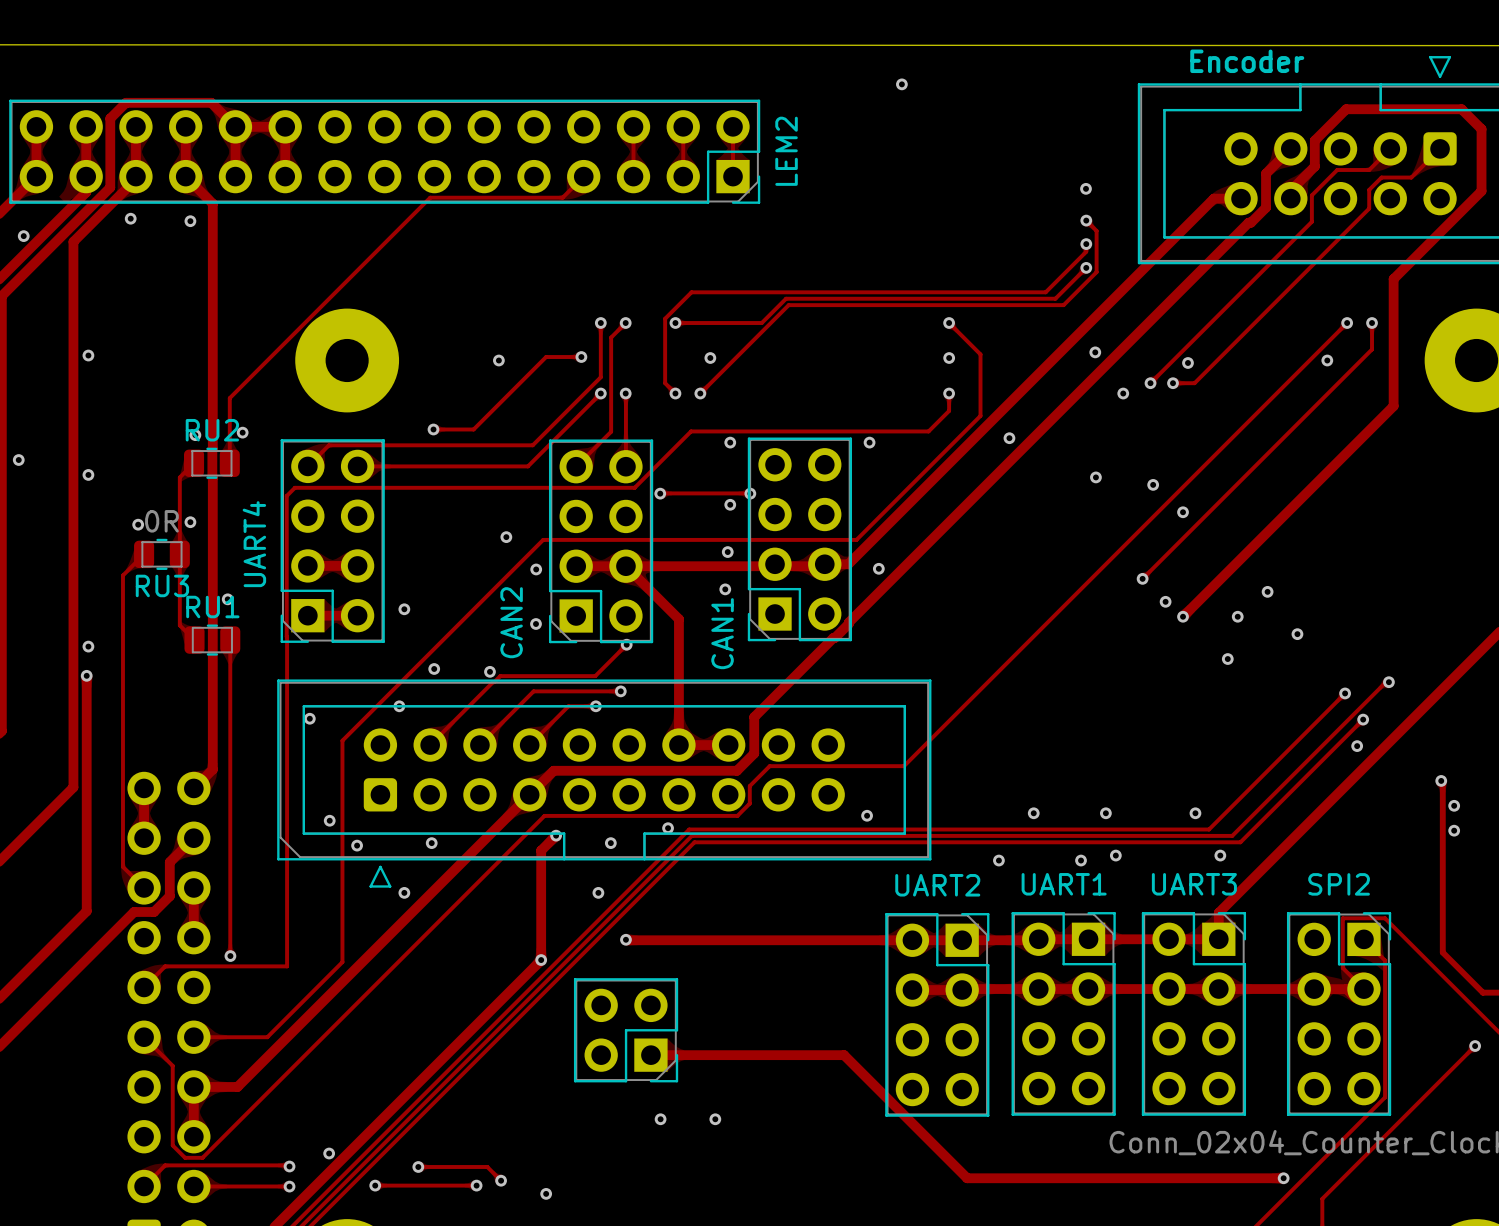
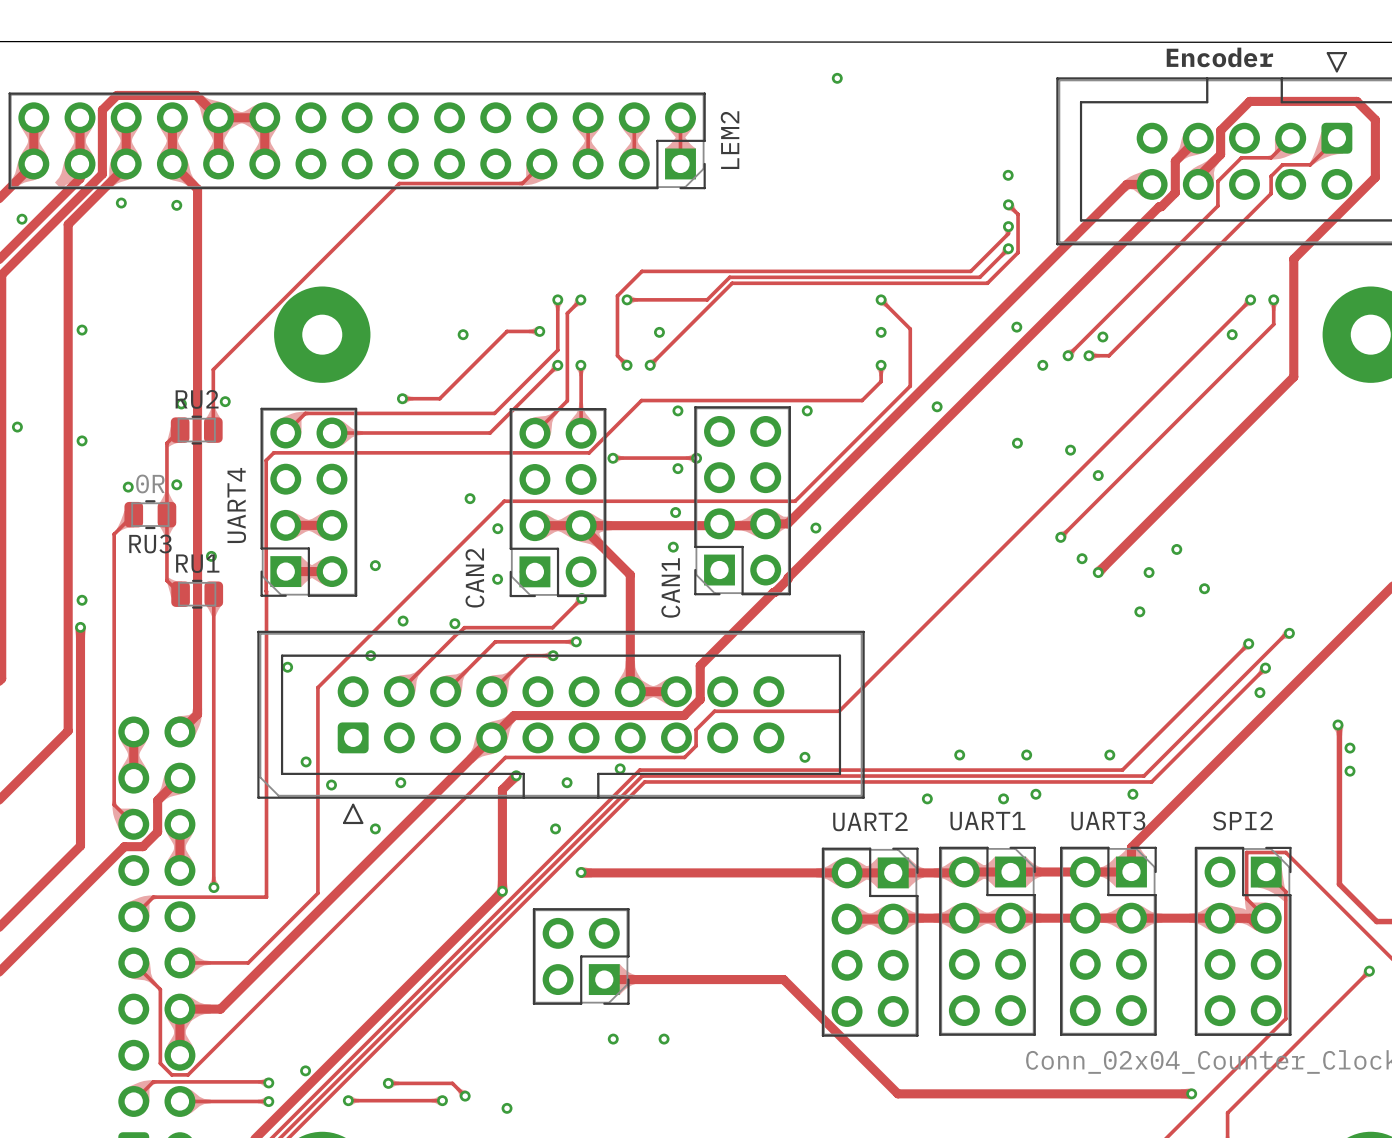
text position: Encoder (1247, 61) -> Encoder (1219, 57)

